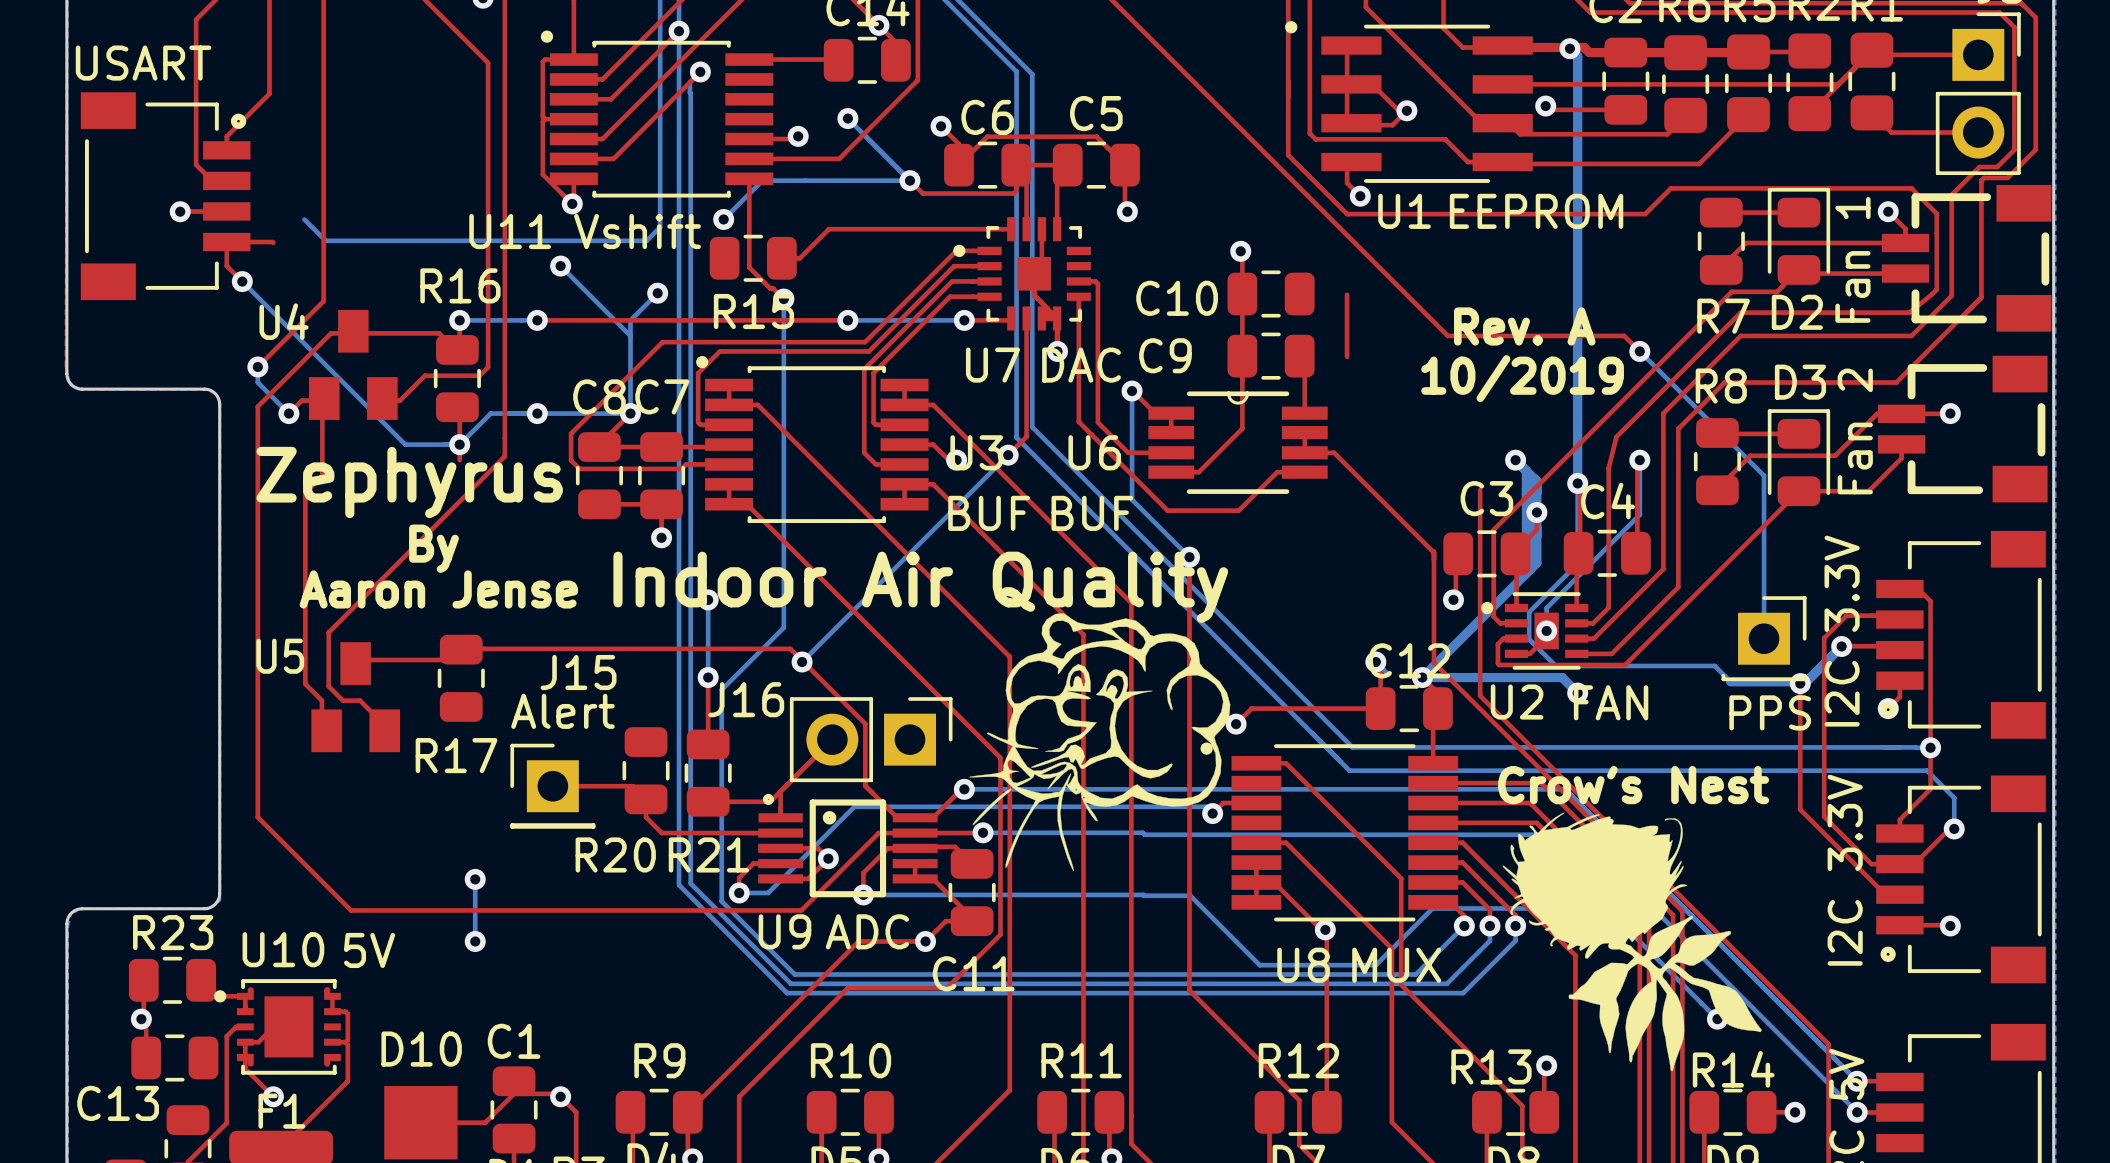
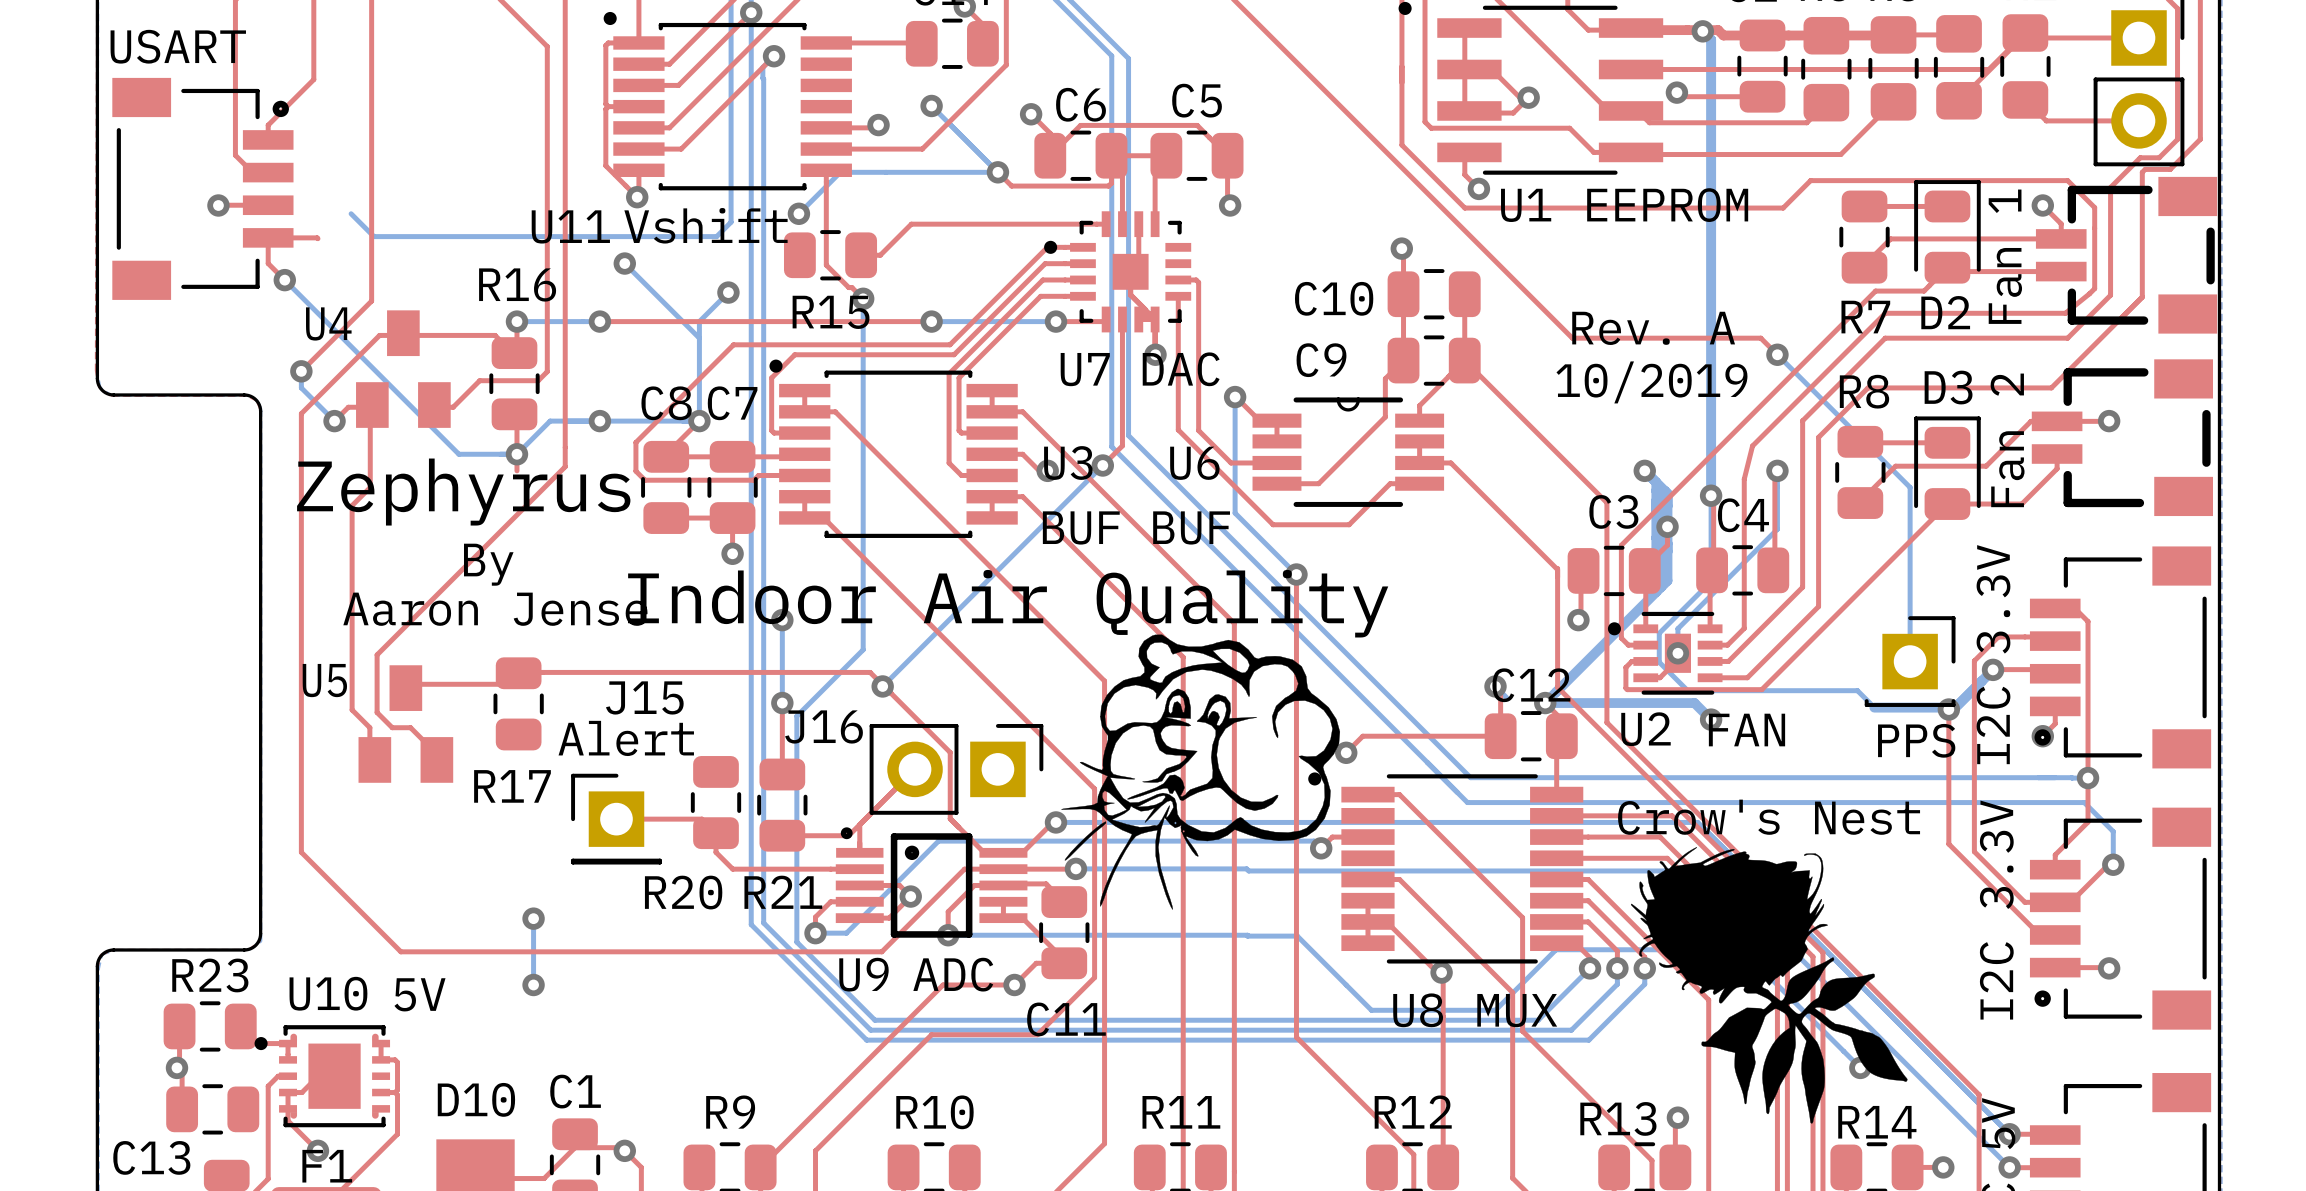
top track: (1240, 251) (1242, 252) (1242, 428) (1198, 472) -> (1401, 248) (1403, 250) (1403, 360) (1385, 378) (1385, 417) (1318, 483) (1306, 483)
via position: (1240, 251) -> (1401, 248)
C10 position: (1271, 294) -> (1434, 294)
C9 position: (1271, 356) -> (1434, 360)
top track: (1299, 356) (1304, 361) (1304, 399) -> (1606, 502) (1464, 360) (1419, 405)

